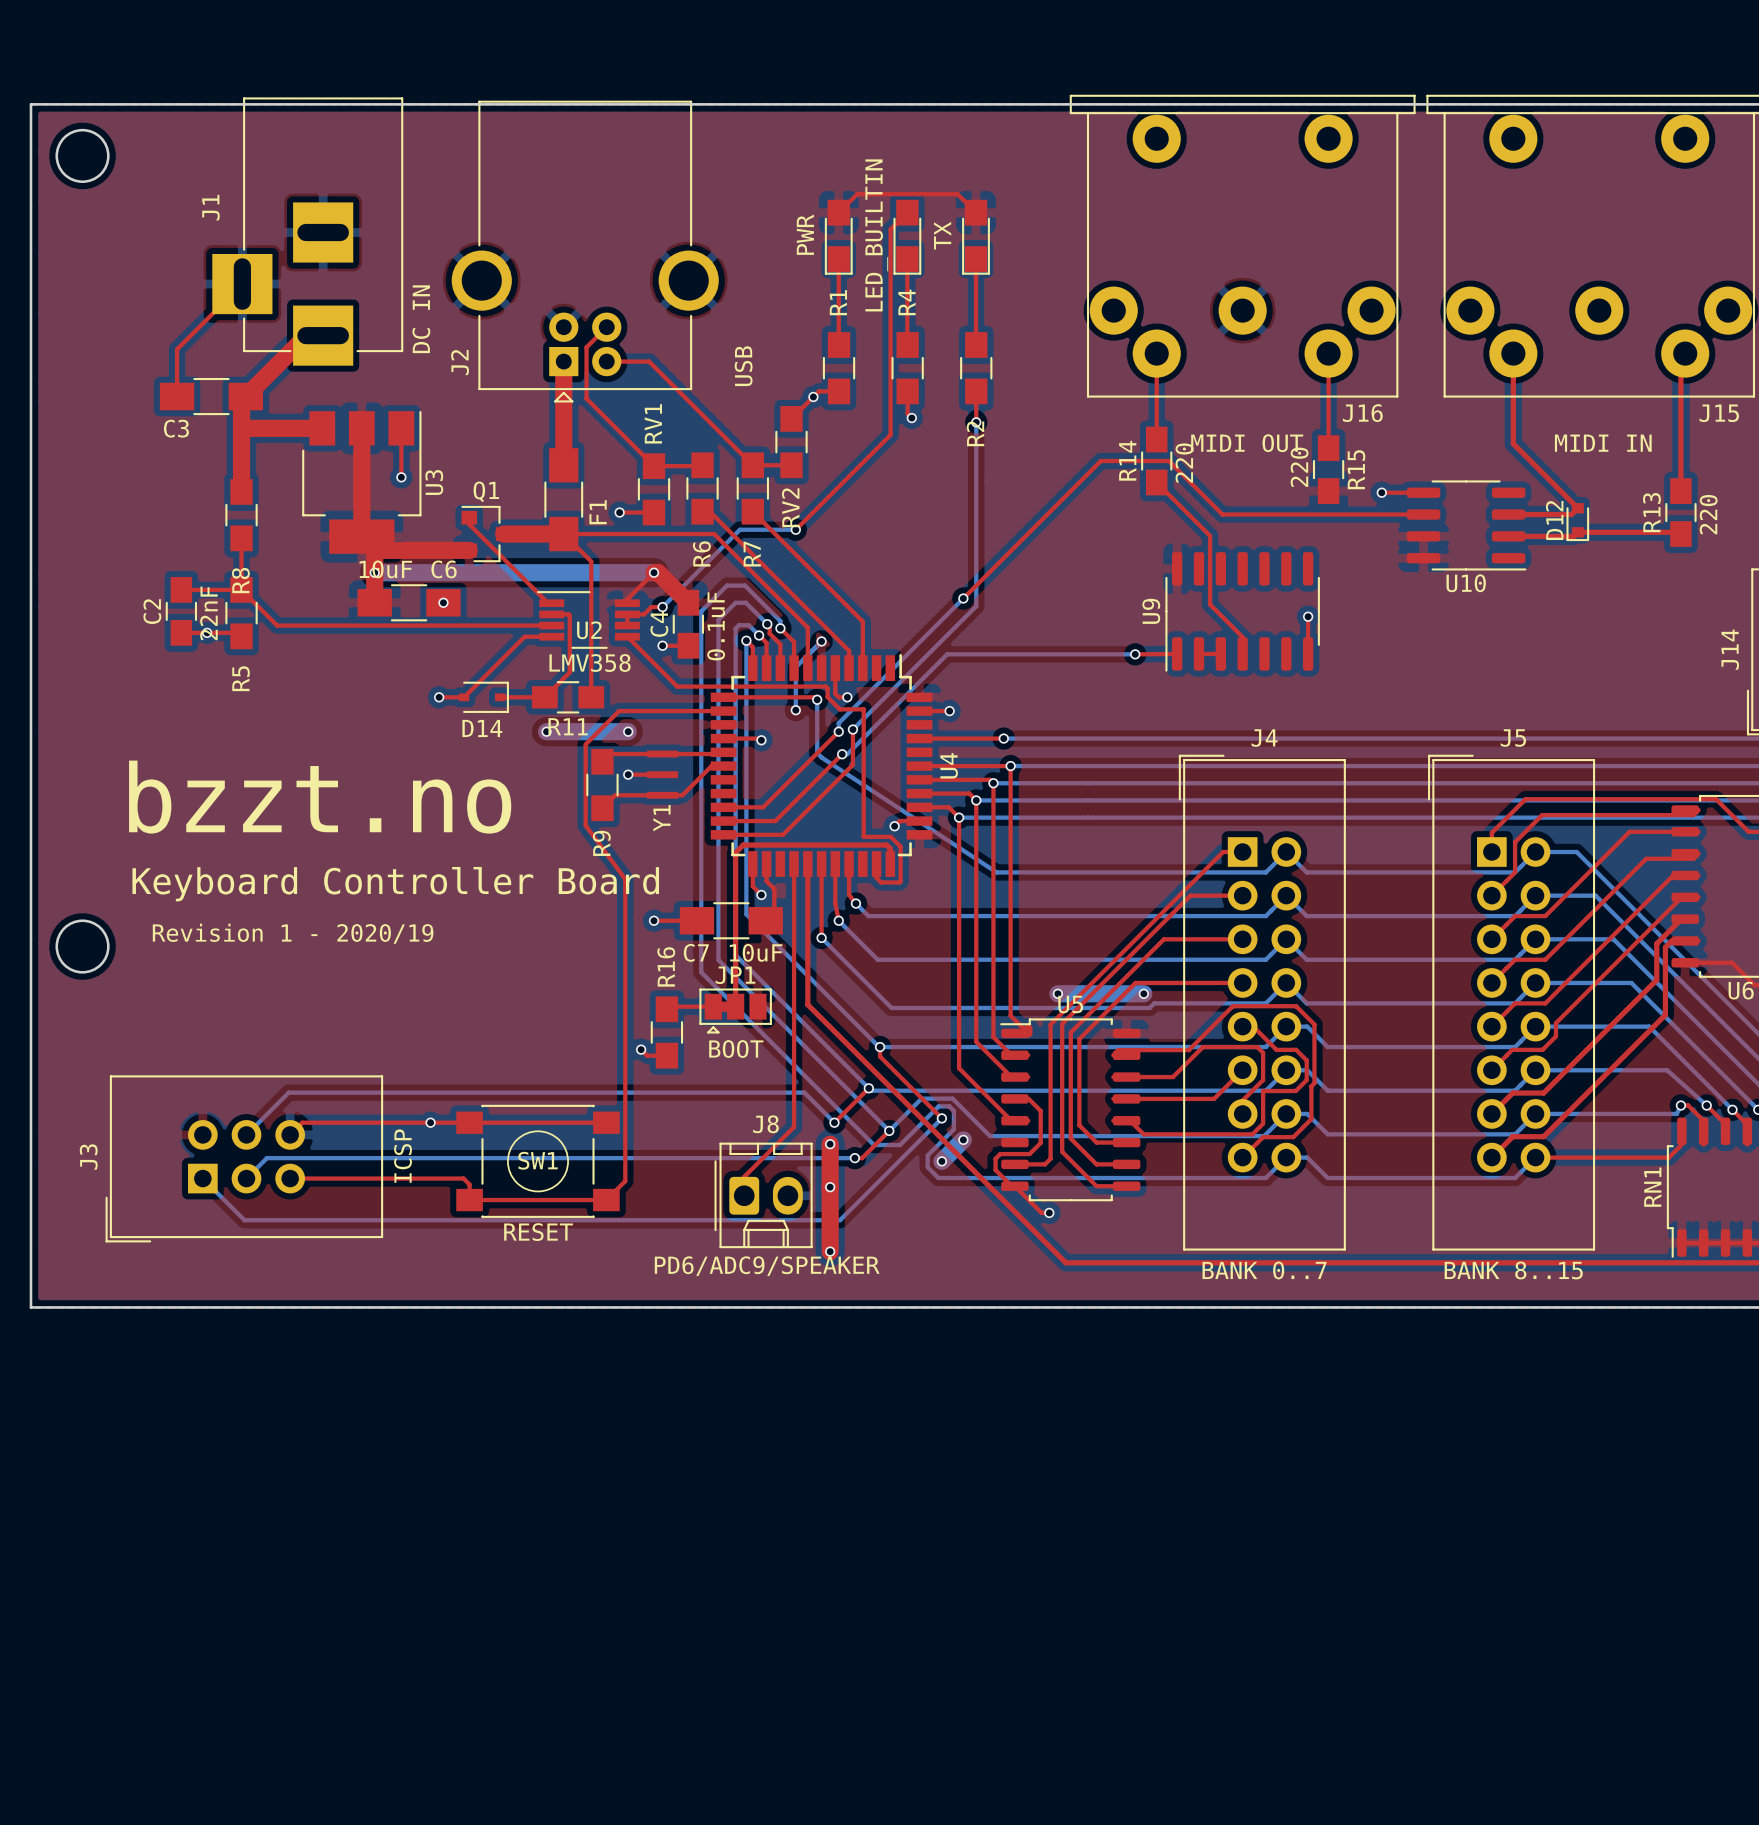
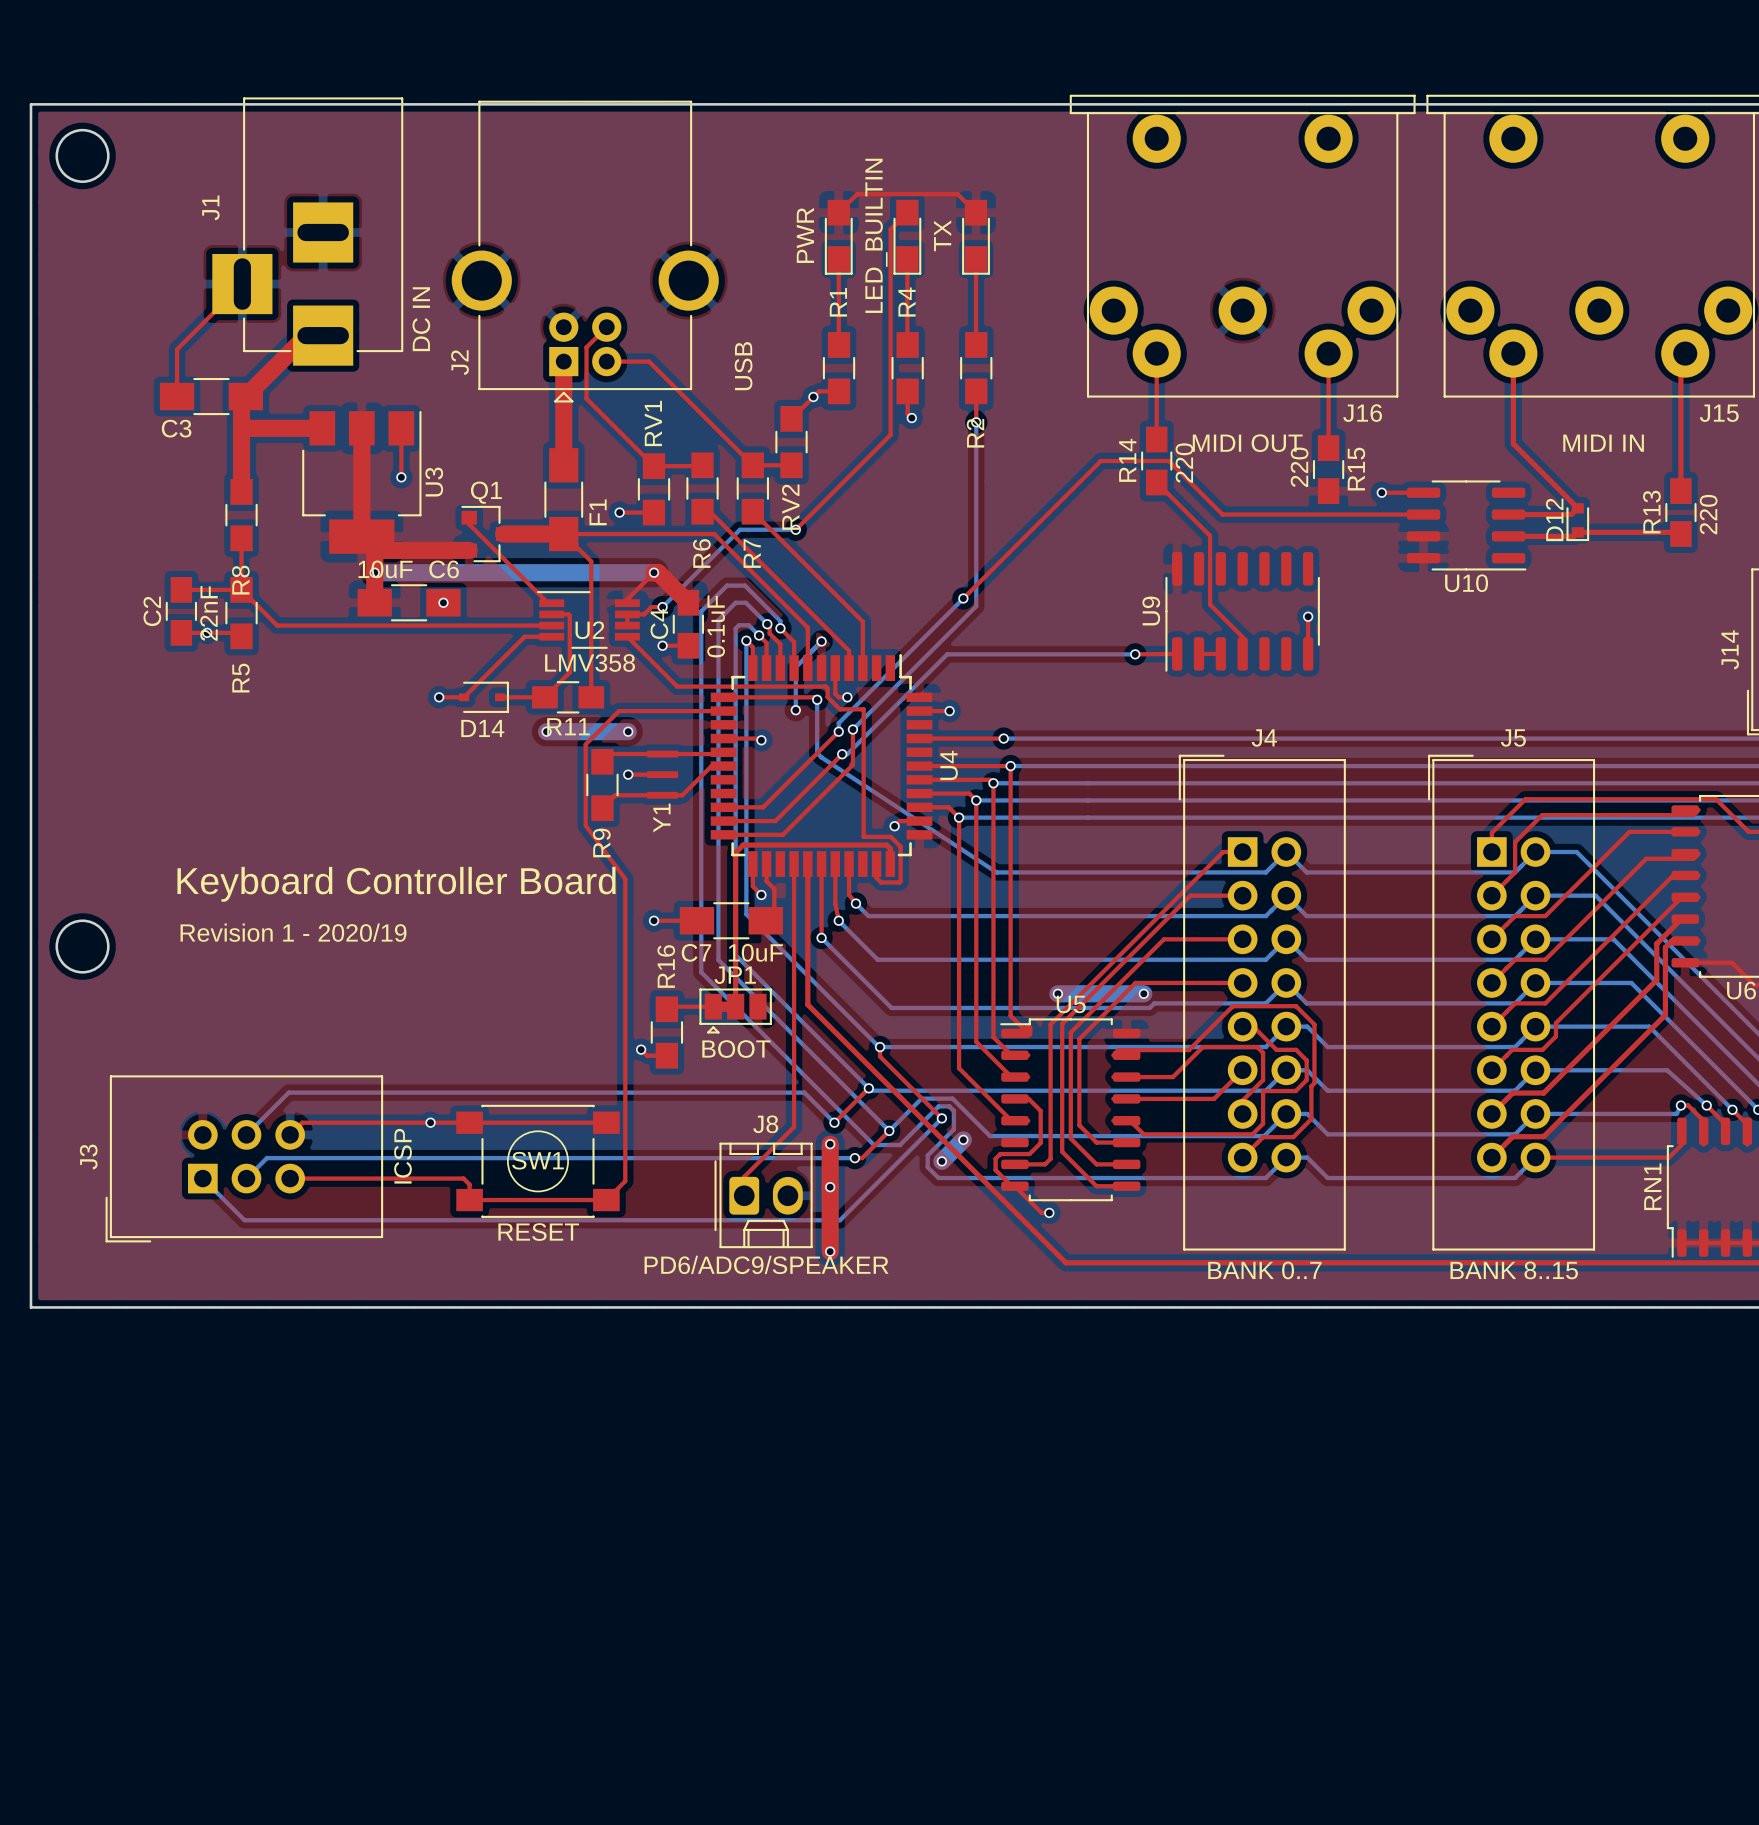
text: bzzt.no (320, 797) -> none

